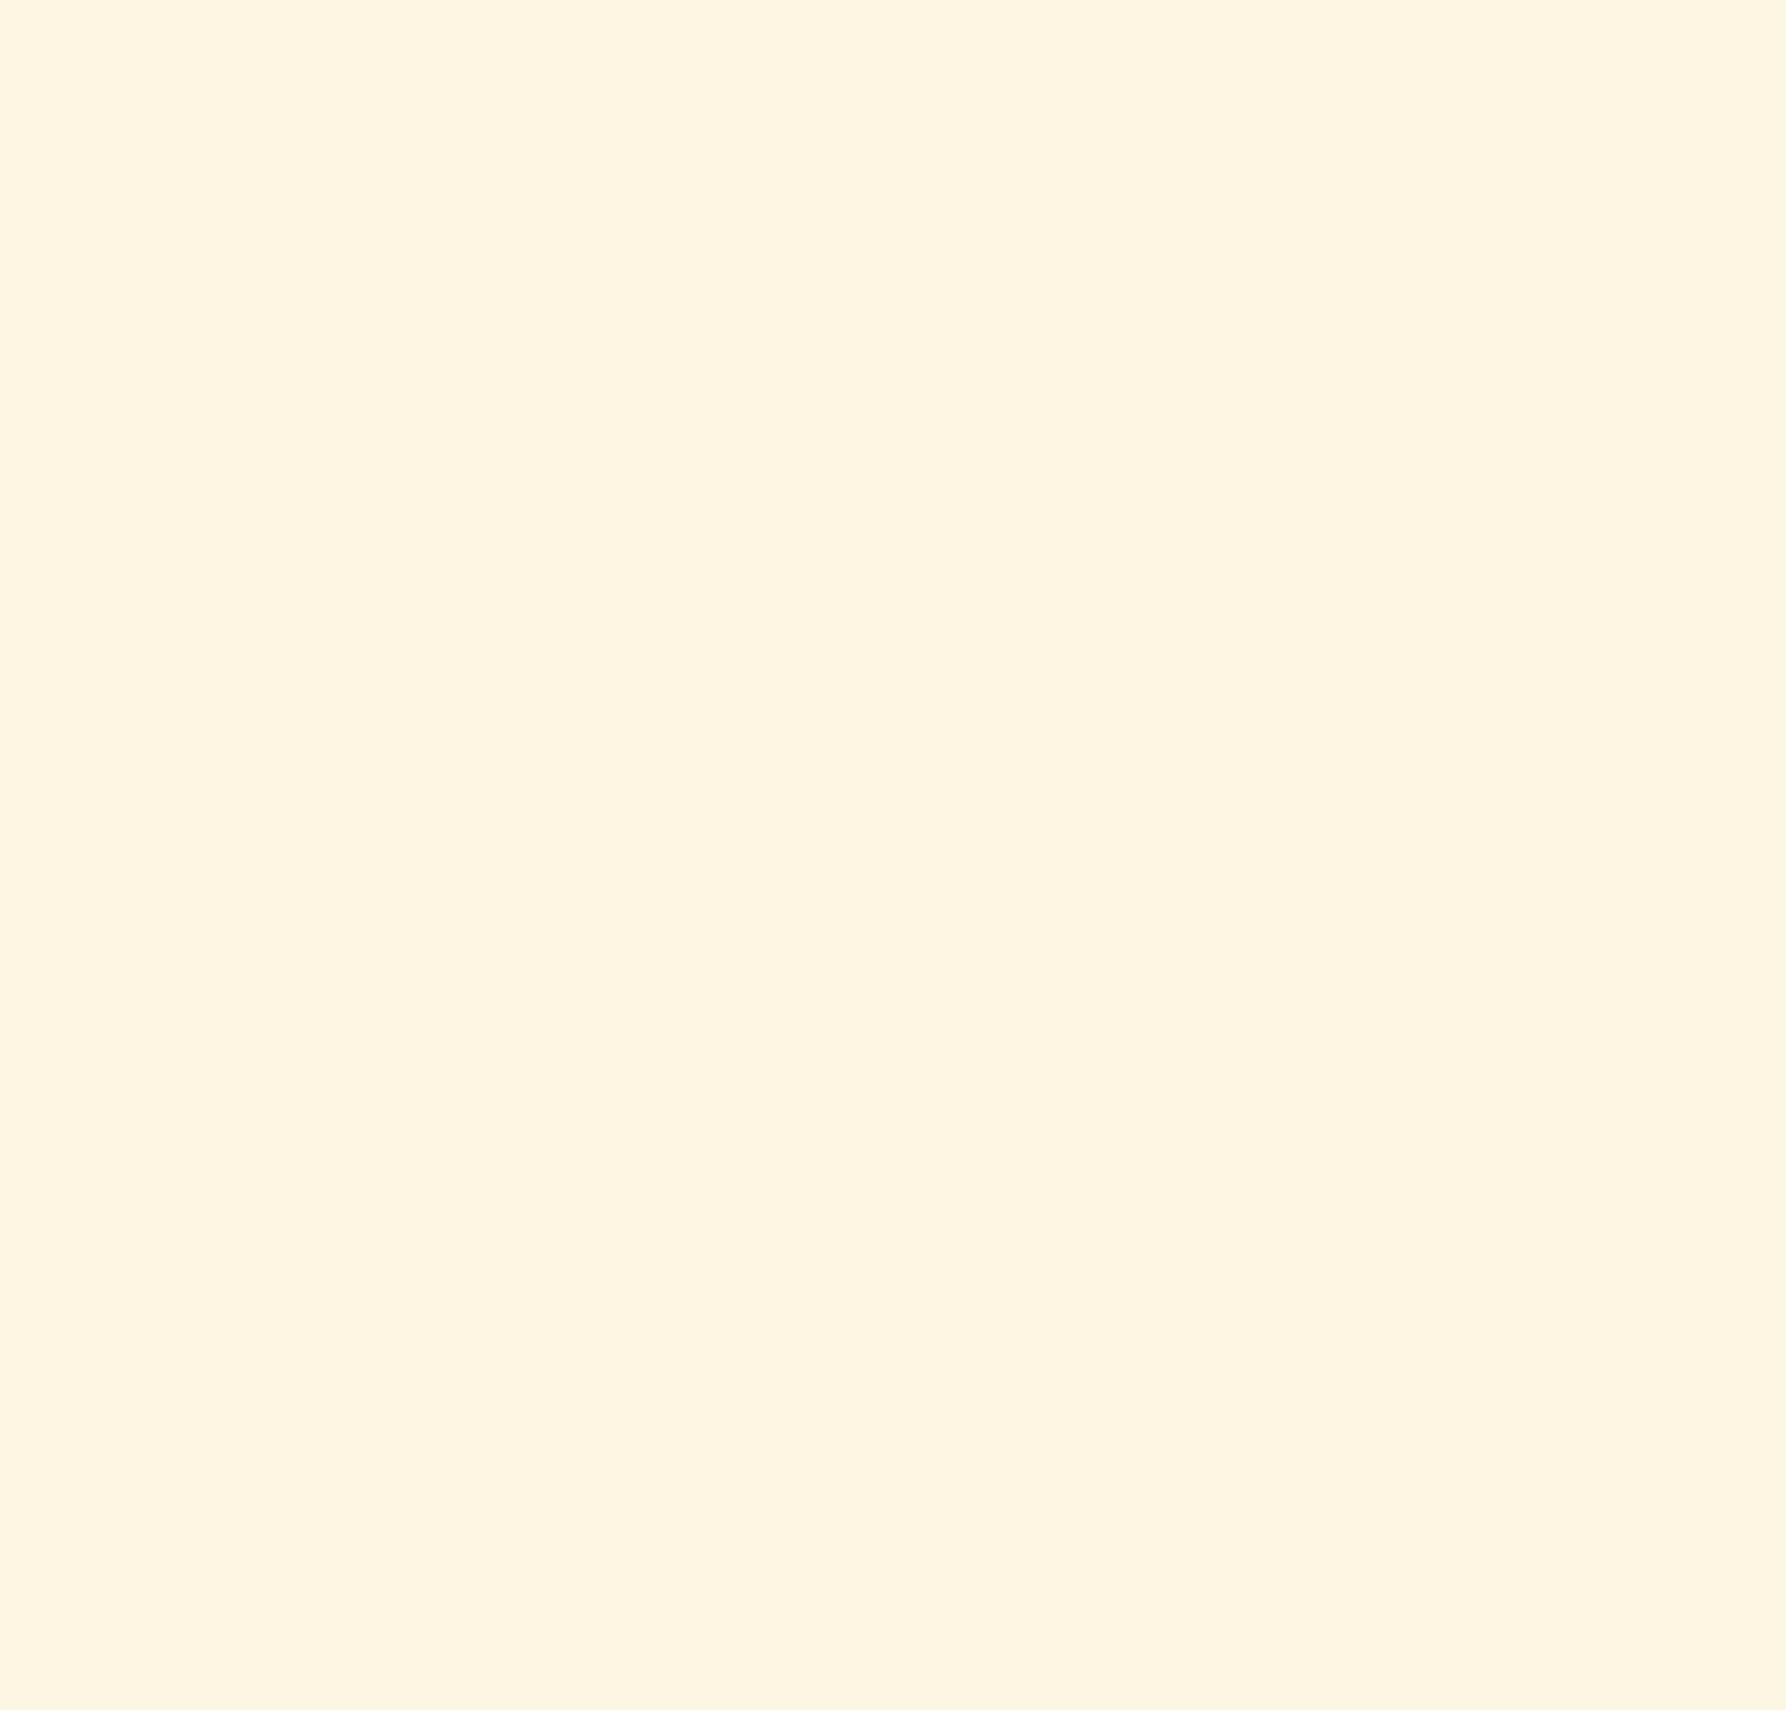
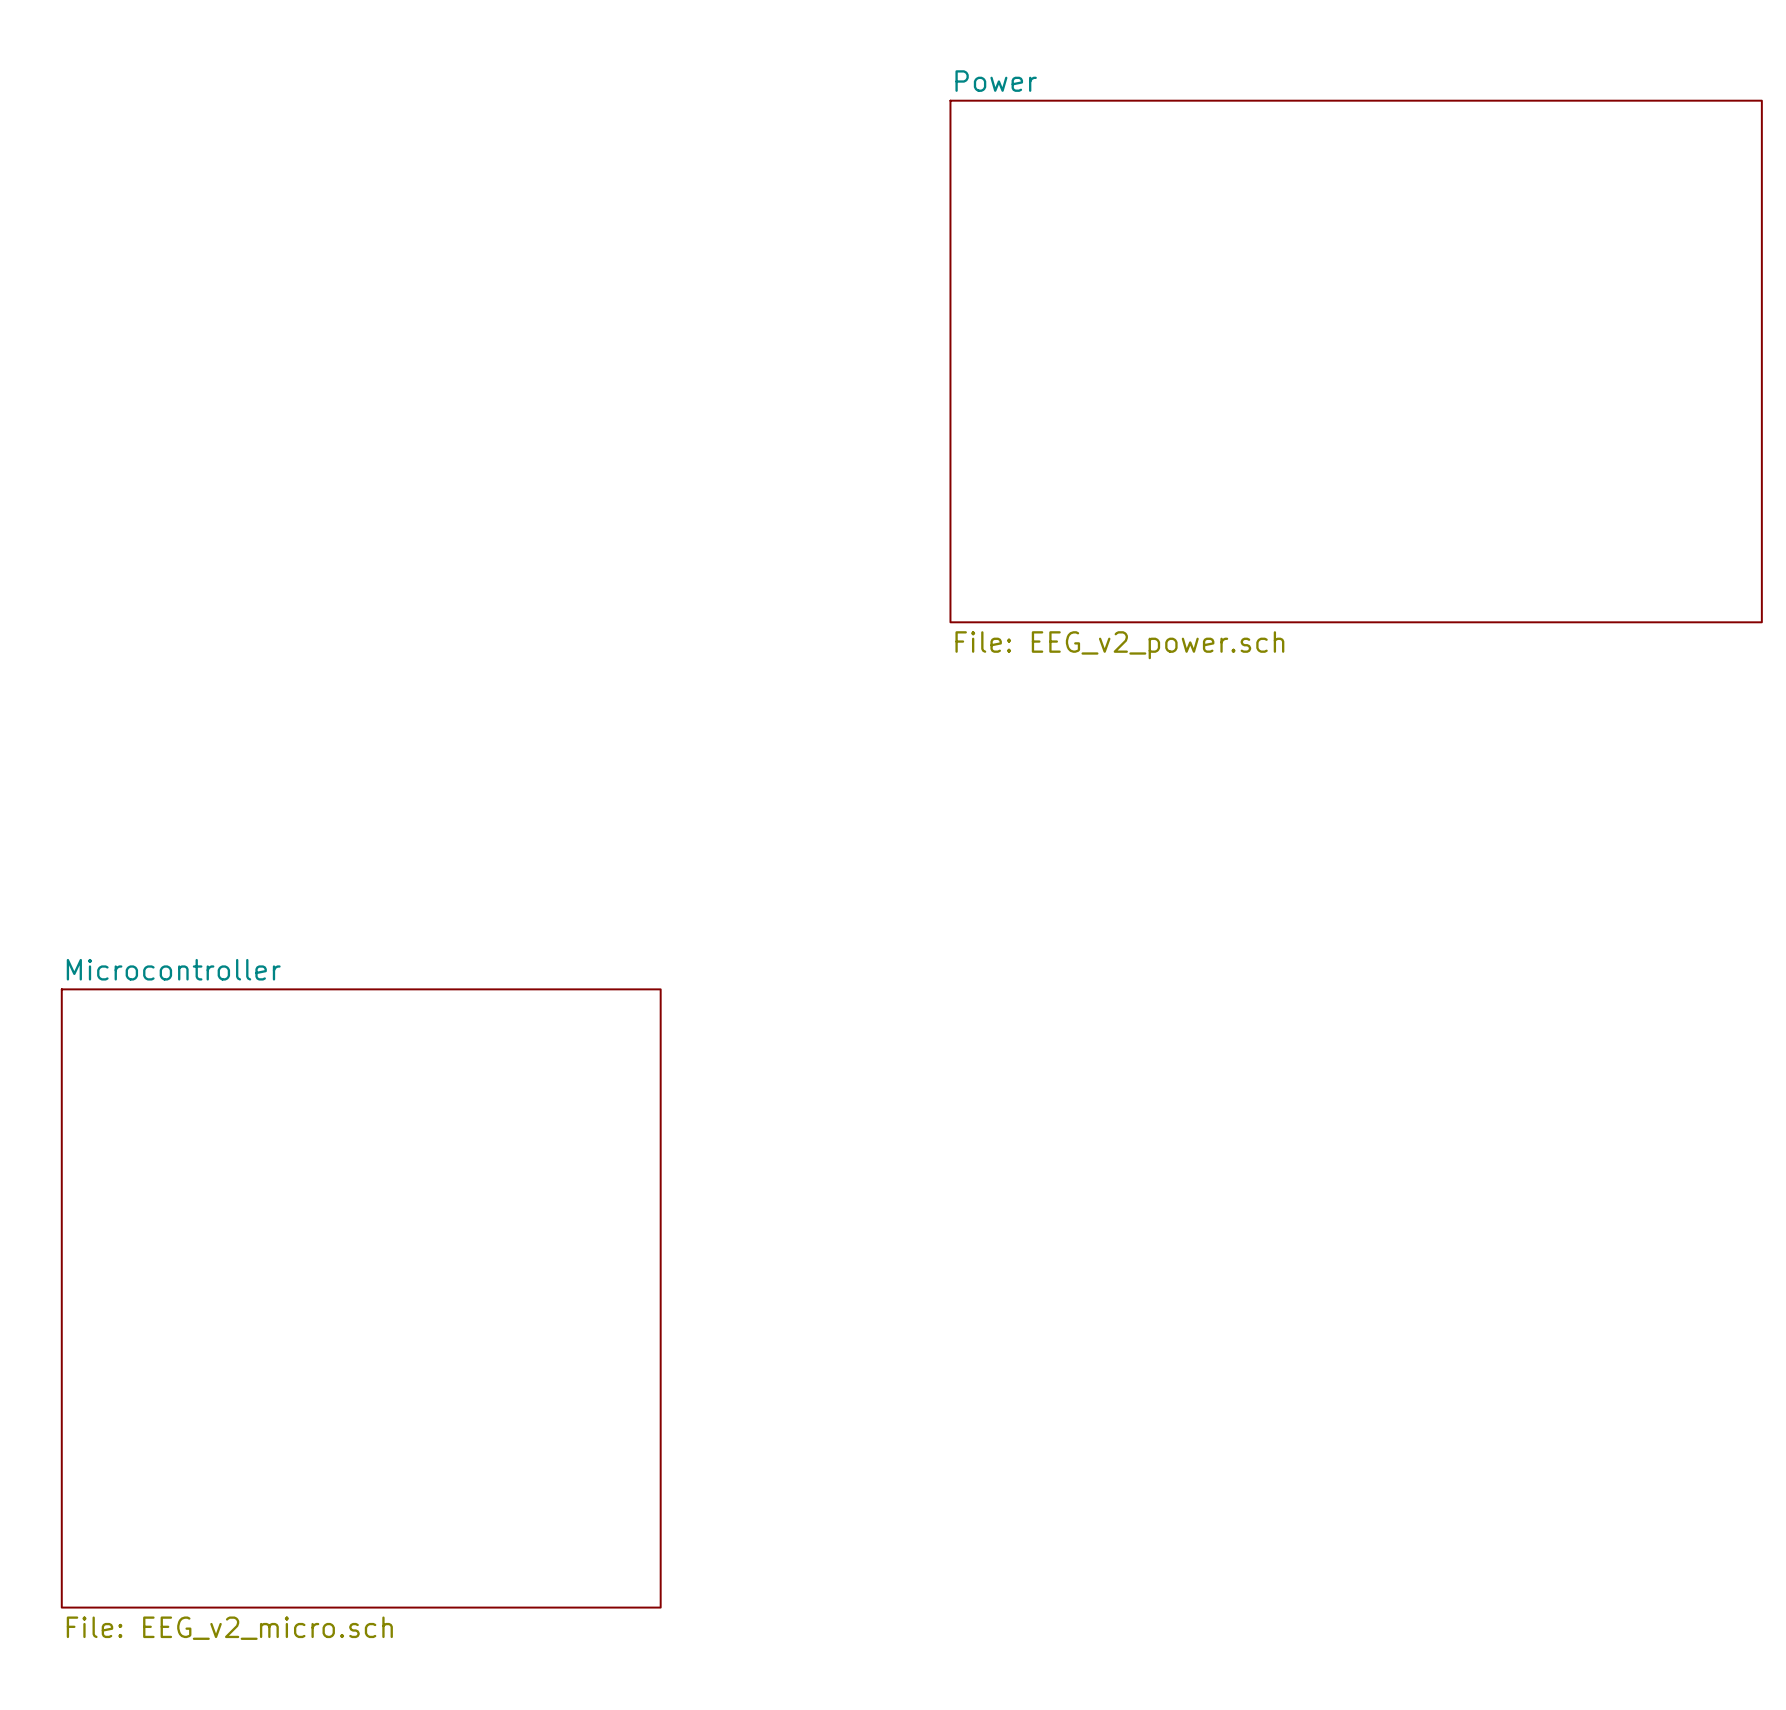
sheet Power: none -> File: EEG_v2_power.sch (1356, 361)
sheet Microcontroller: none -> File: EEG_v2_micro.sch (361, 1298)

